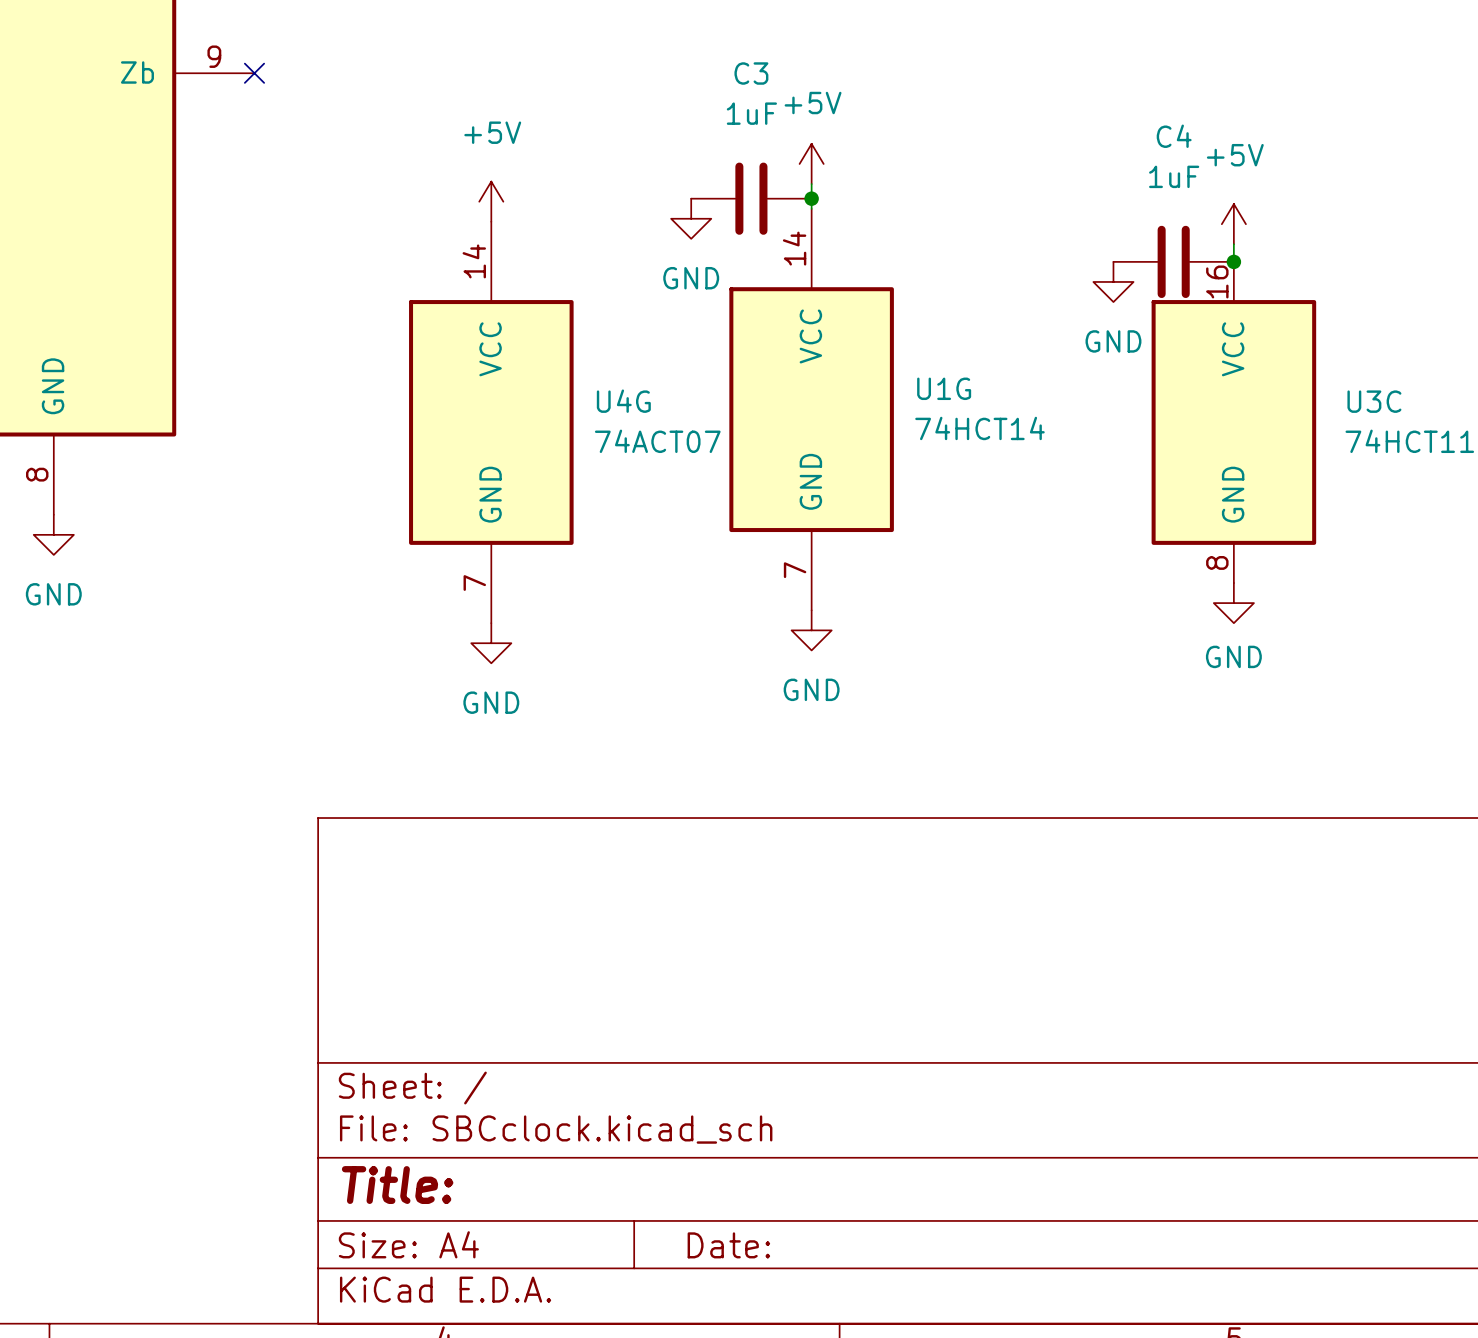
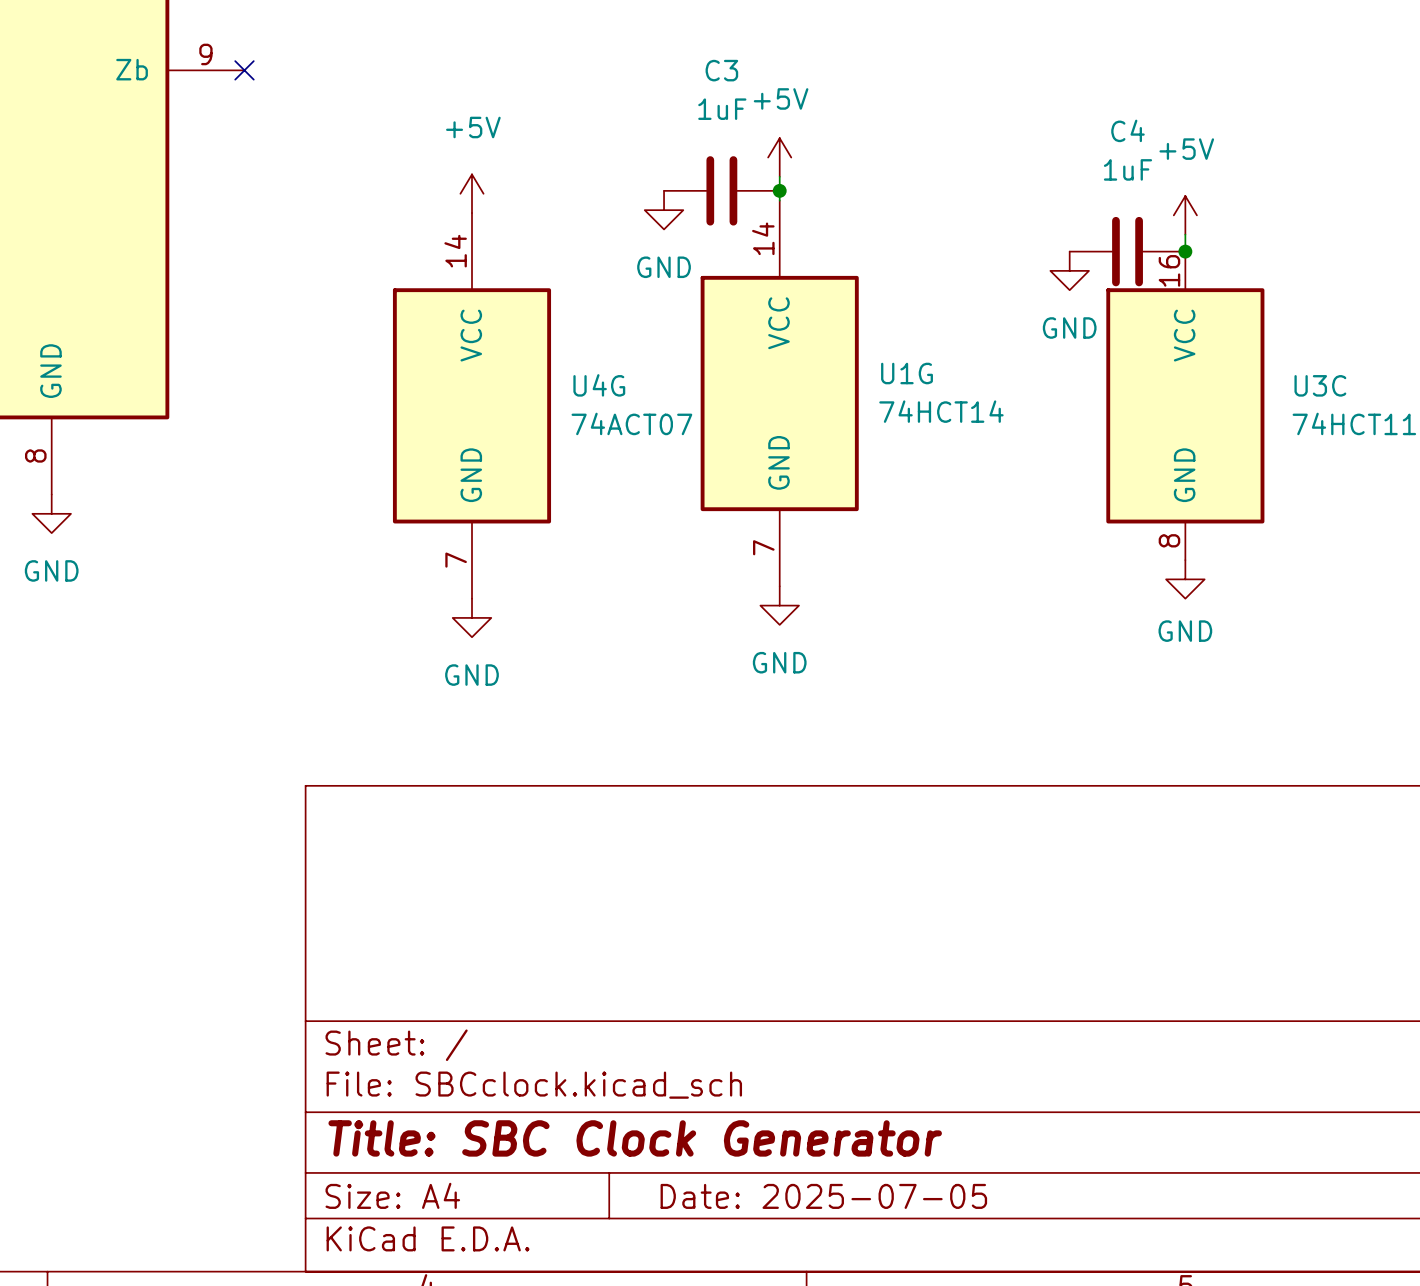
title block: Title: (397, 1185) -> Title: SBC Clock Generator (635, 1138)
title block: Date: (728, 1245) -> Date: 2025-07-05 (823, 1196)

